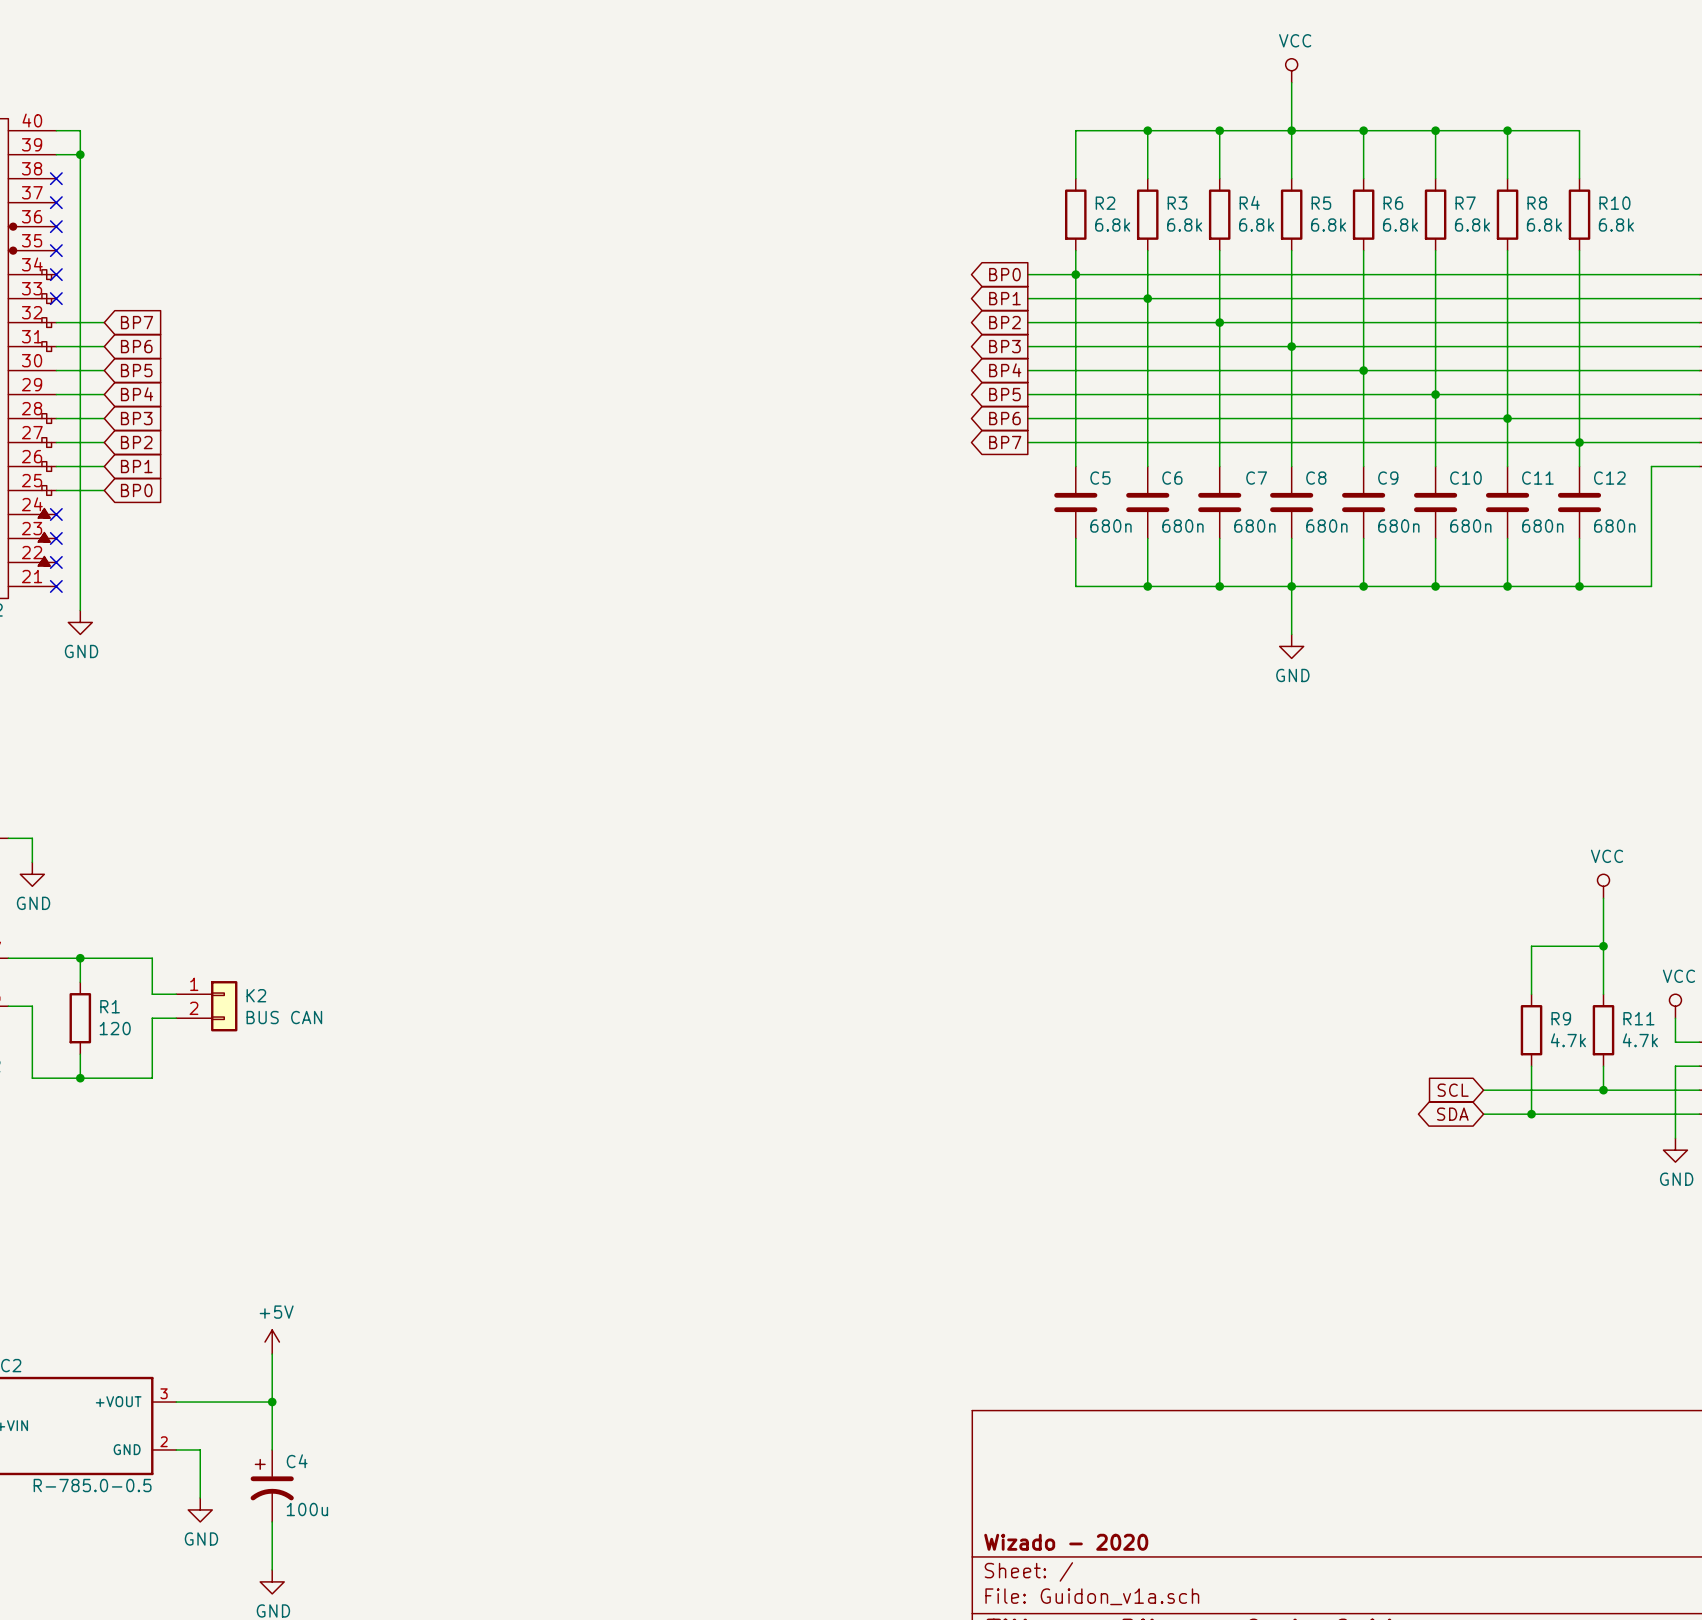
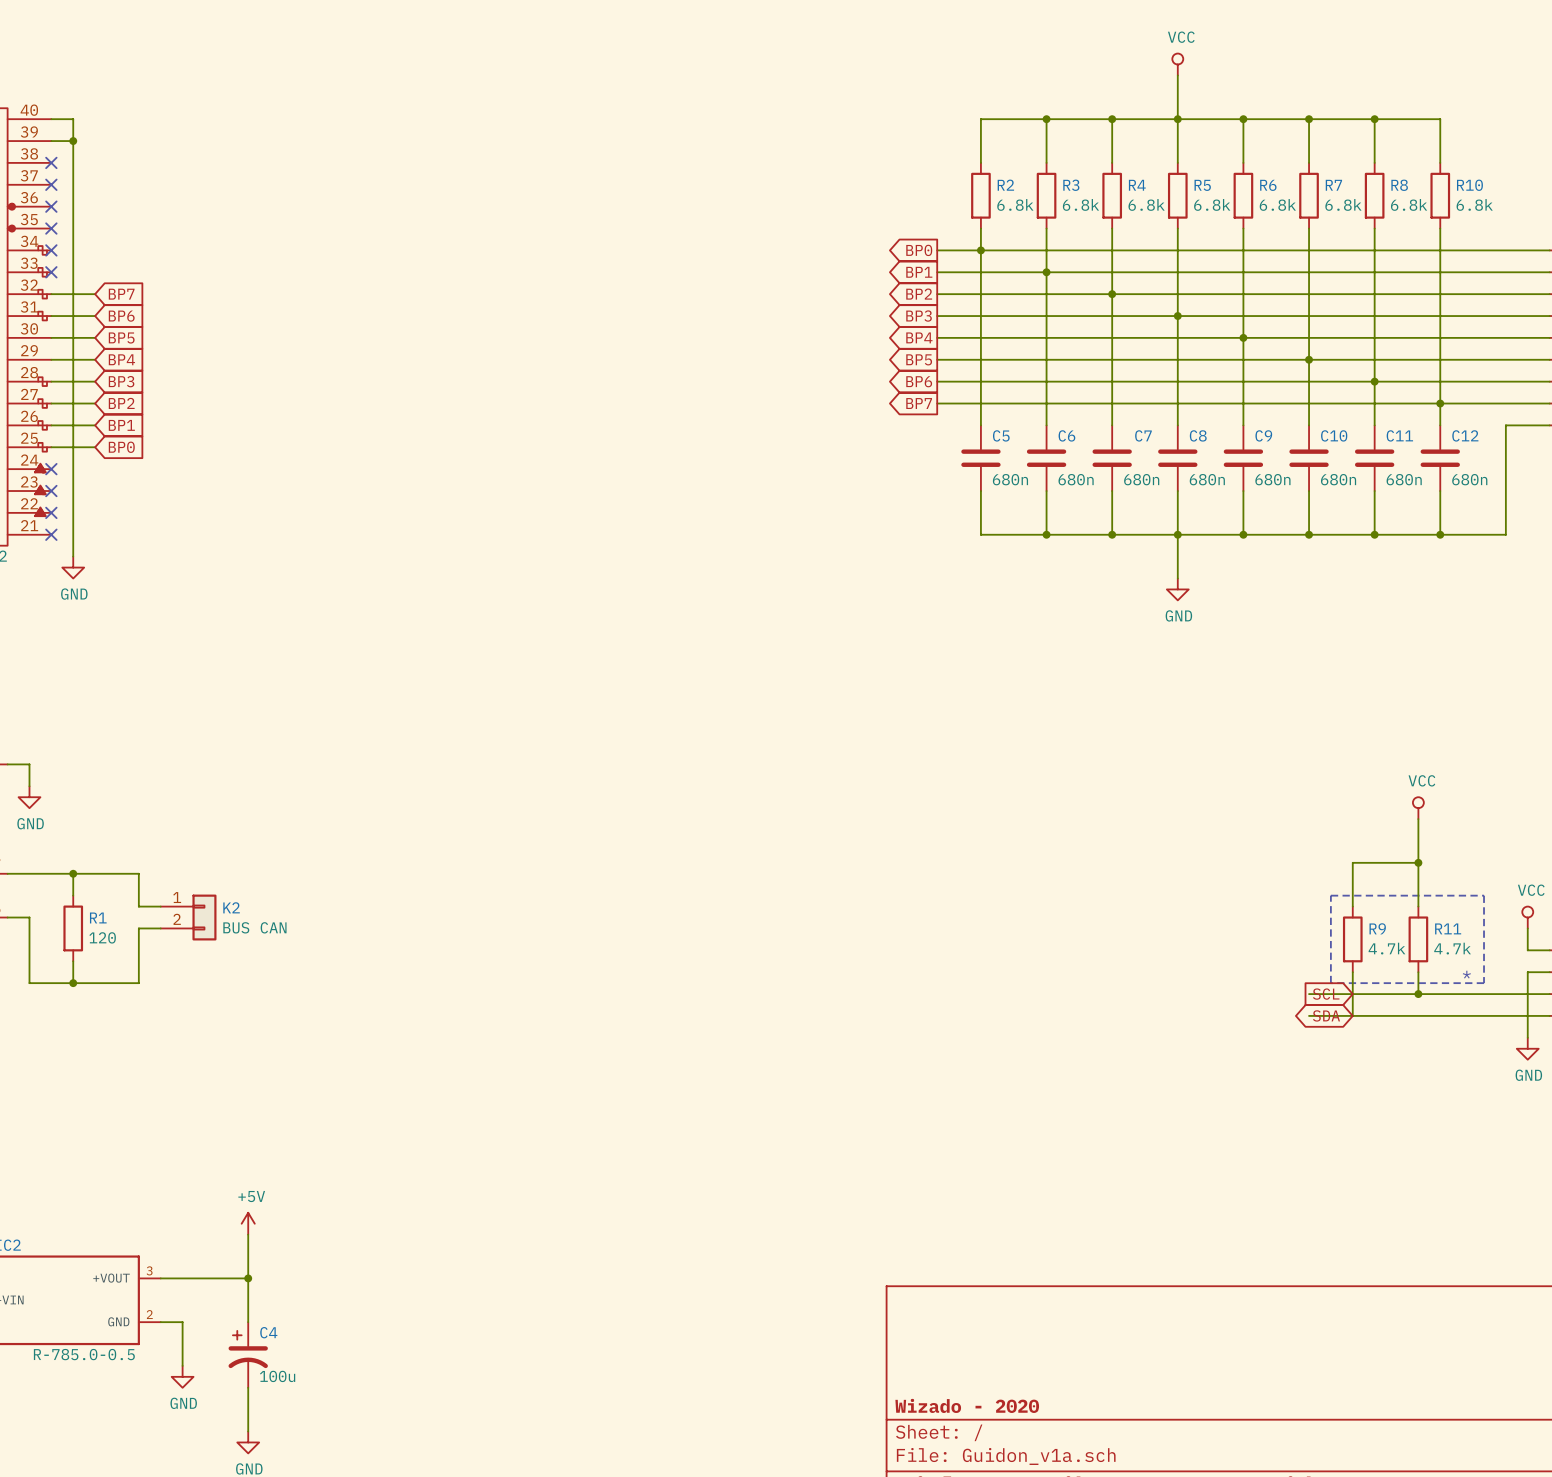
power symbol position: VCC (1603, 886) -> VCC (1418, 808)
wire: (1603, 898) (1603, 994) -> (1418, 819) (1418, 906)
wire: (1531, 946) (1531, 994) -> (1396, 862) (1352, 862) (1352, 906)
wire: (1555, 946) (1603, 946) -> (1309, 994) (1352, 994)
junction position: (1603, 946) -> (1418, 862)
line: none -> (1330, 895) (1484, 895) (1484, 983) (1330, 983) (1330, 895)
R9 position: (1531, 1030) -> (1352, 939)
R11 position: (1603, 1030) -> (1418, 939)
text: none -> * (1466, 974)
wire: none -> (1352, 972) (1352, 1015) (1309, 1015)
wire: (1531, 1066) (1531, 1114) -> none
wire: (1603, 1066) (1603, 1090) -> (1418, 972) (1418, 994)
junction: none -> (1418, 994)
junction: (1603, 1090) -> none
junction: (1531, 1114) -> none

